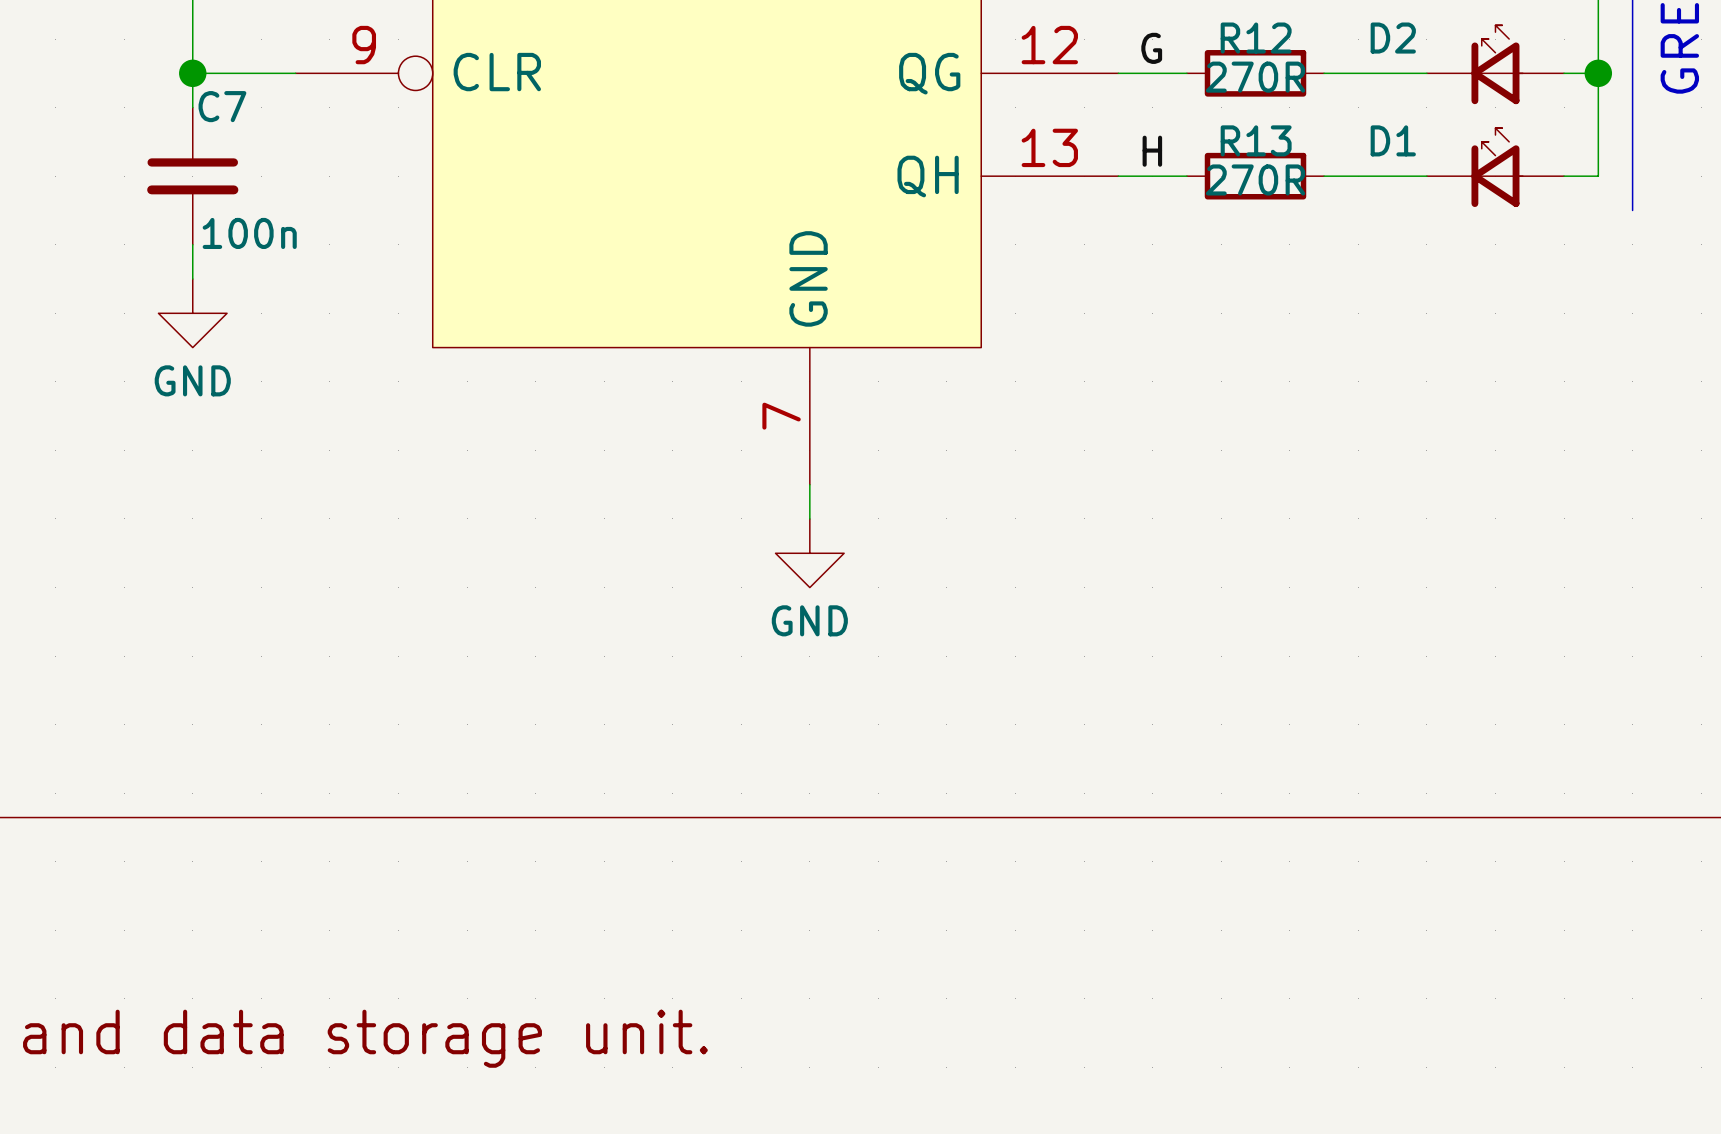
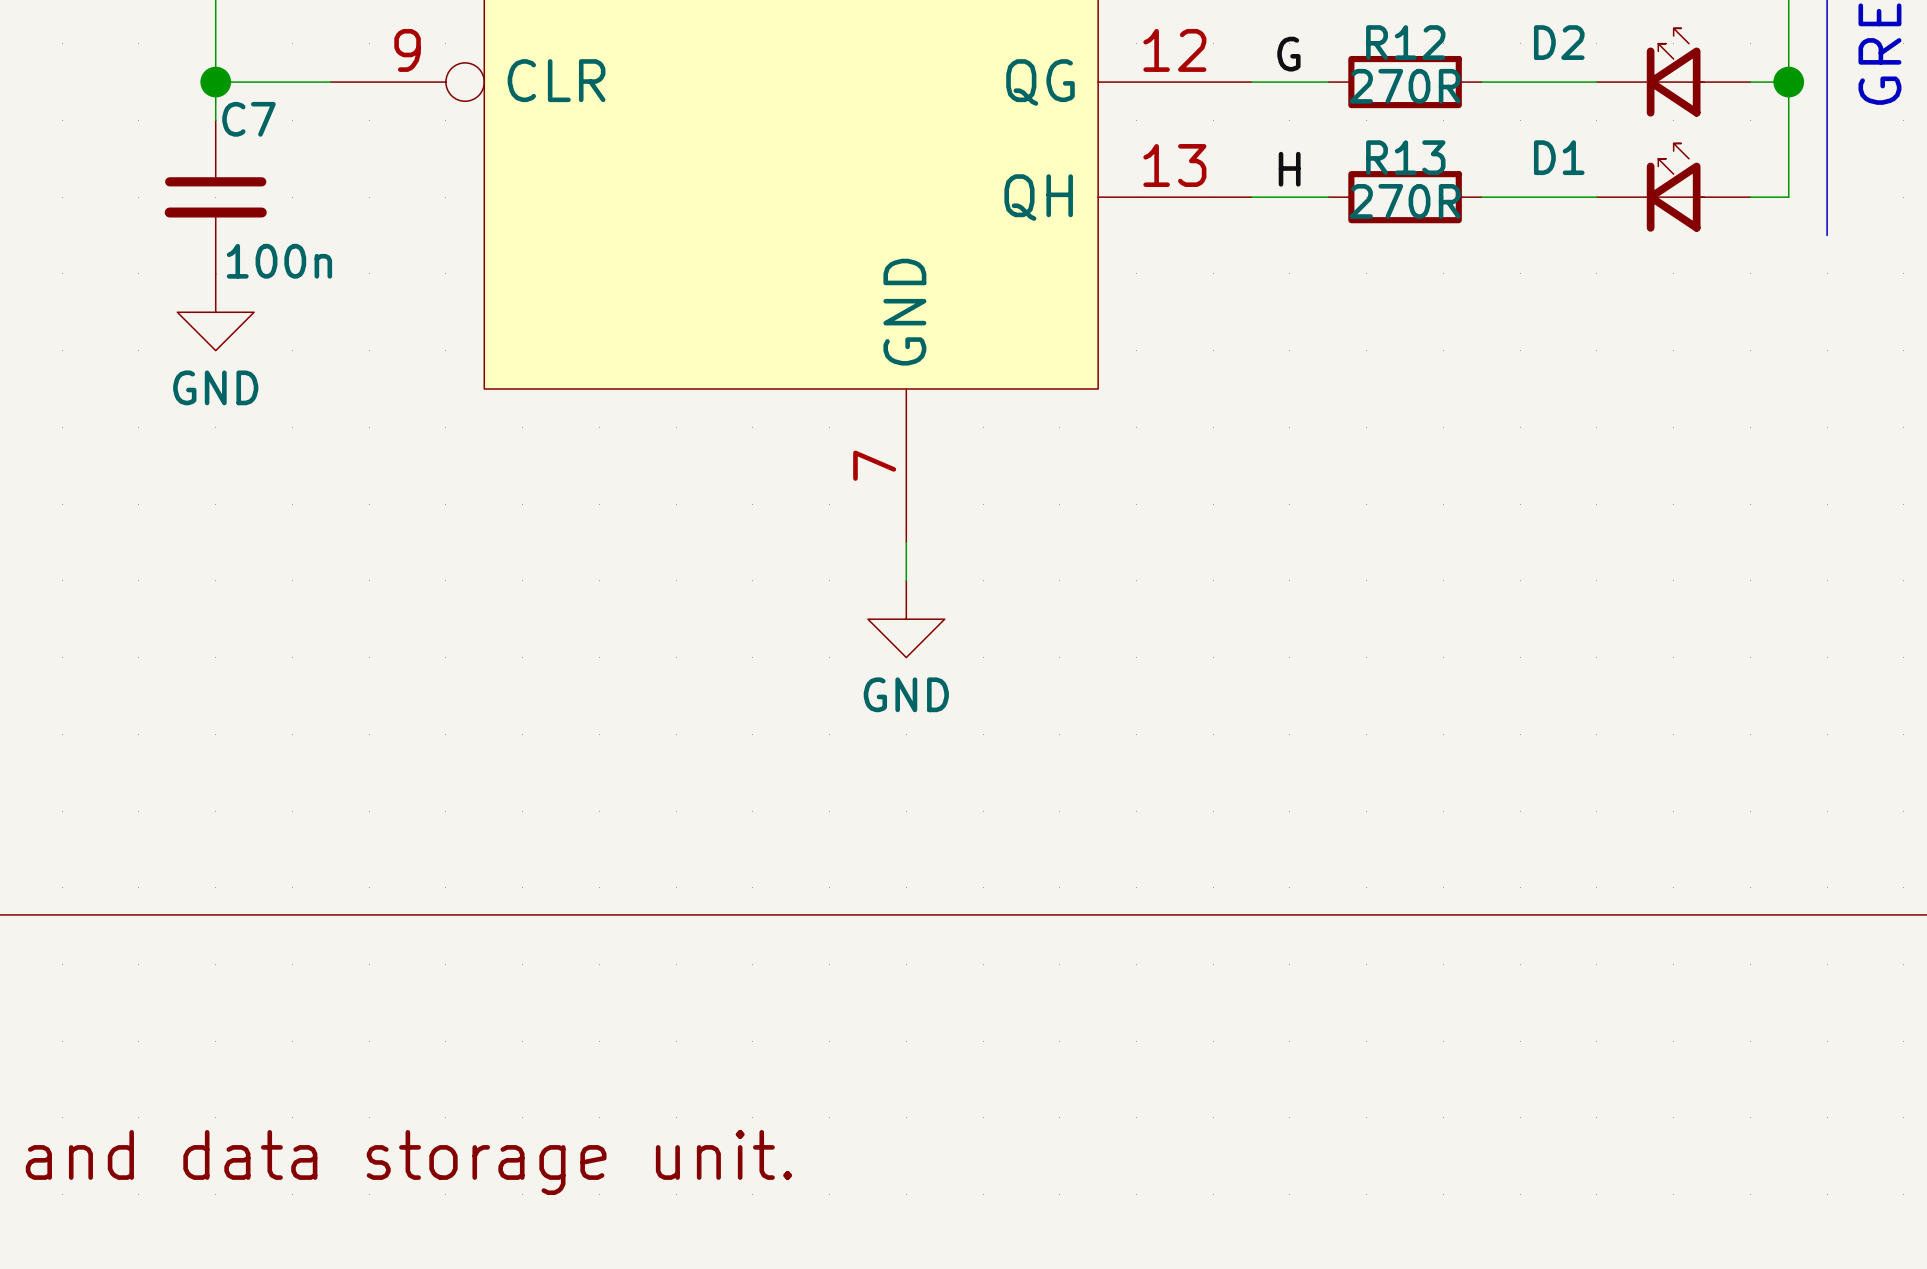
power symbol position: GND (192, 313) -> GND (215, 312)

